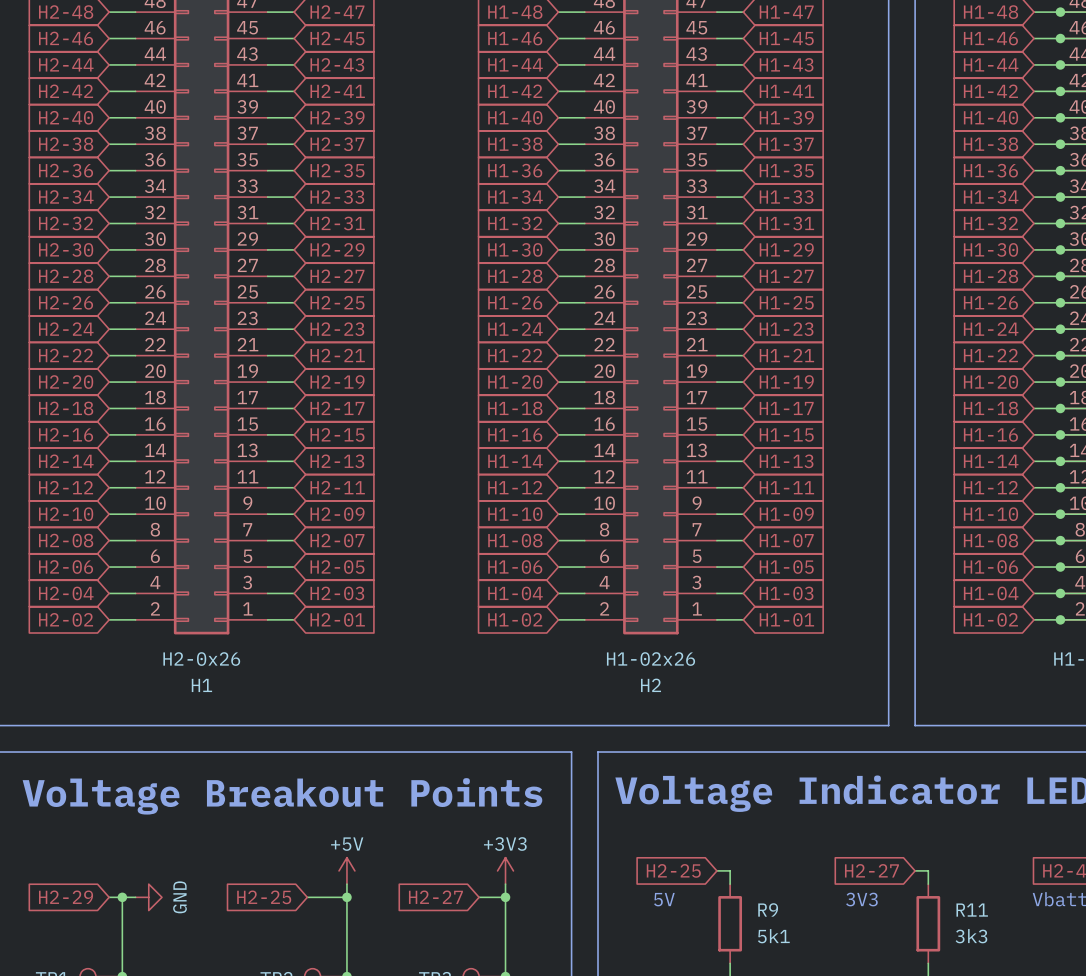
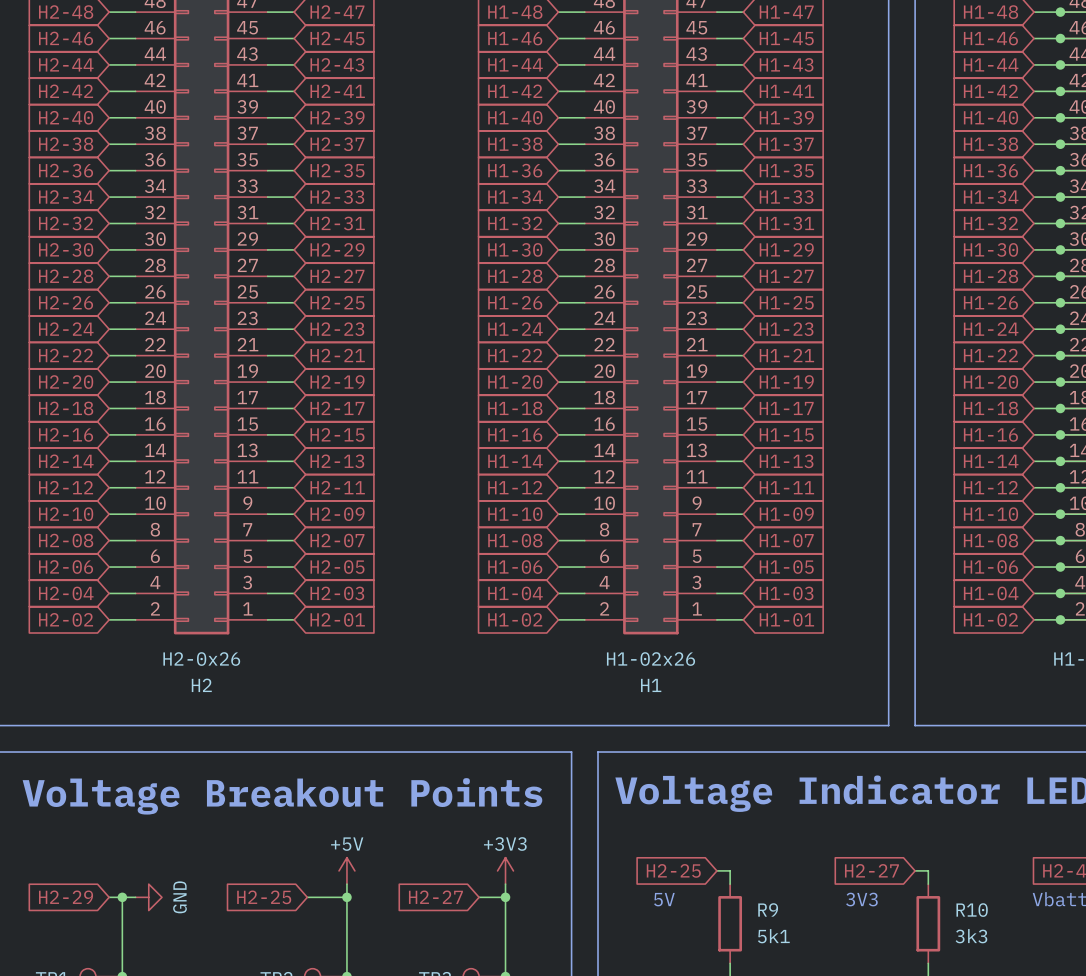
H1 name: H1 (201, 685) -> H2 (201, 685)
H2 name: H2 (651, 685) -> H1 (651, 685)
R11 name: R11 (972, 910) -> R10 (972, 910)

